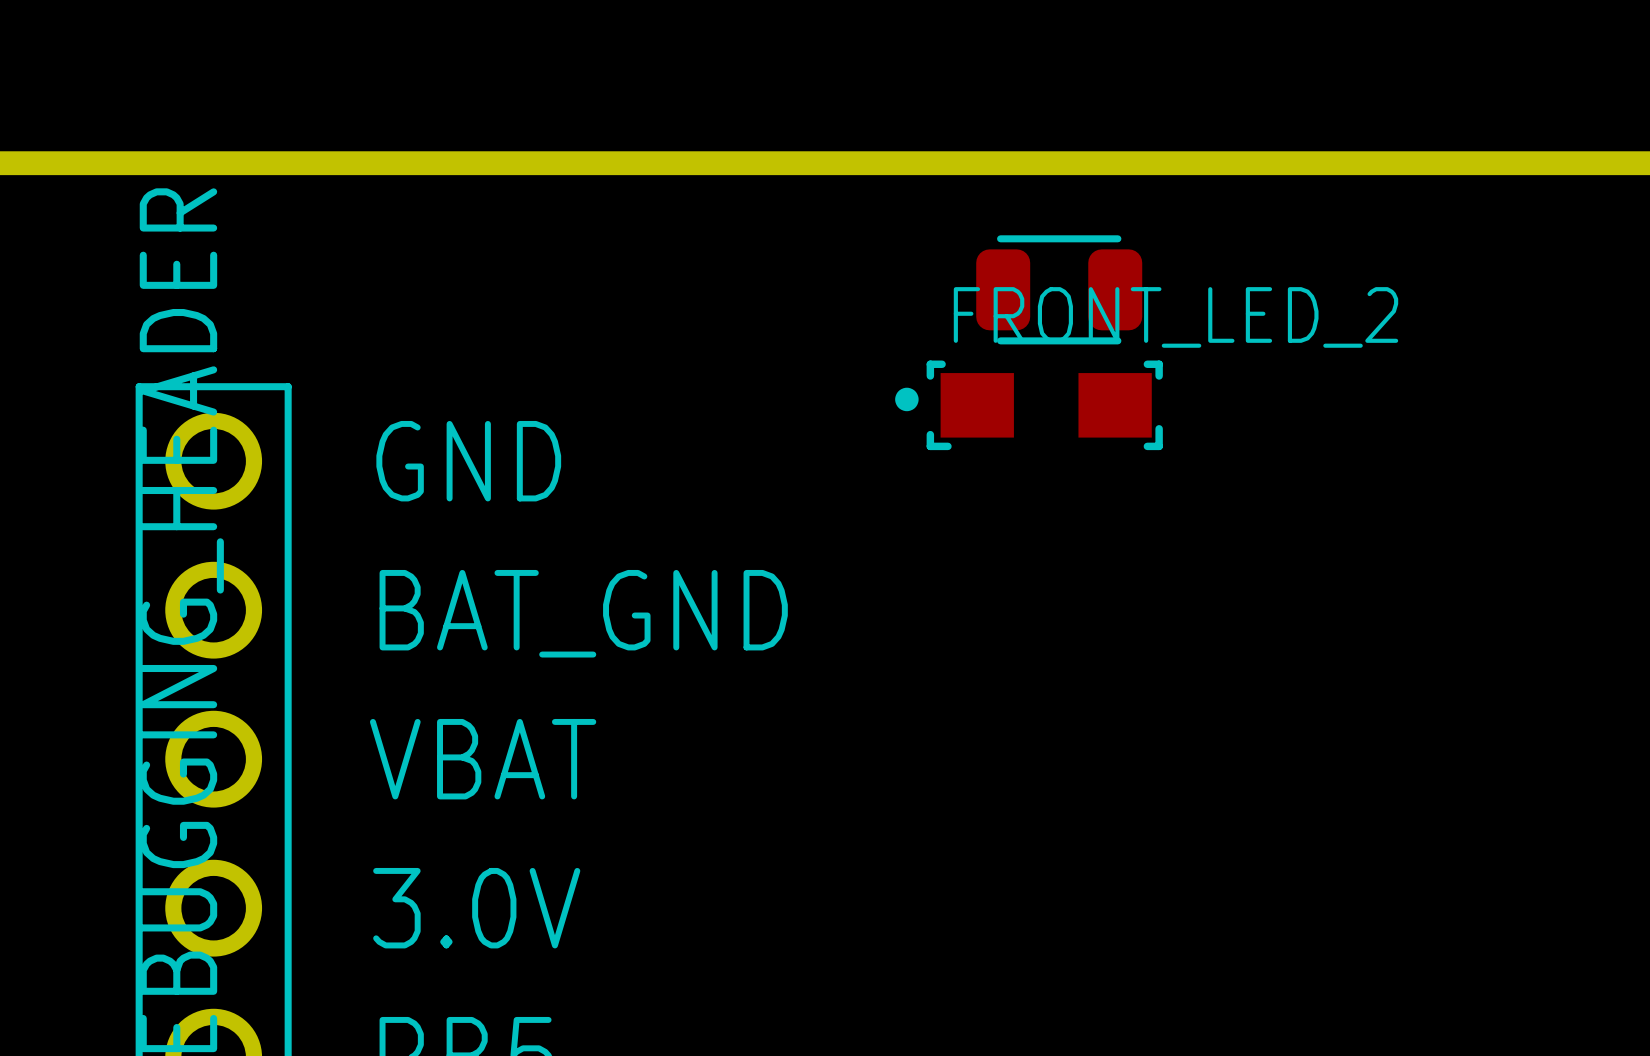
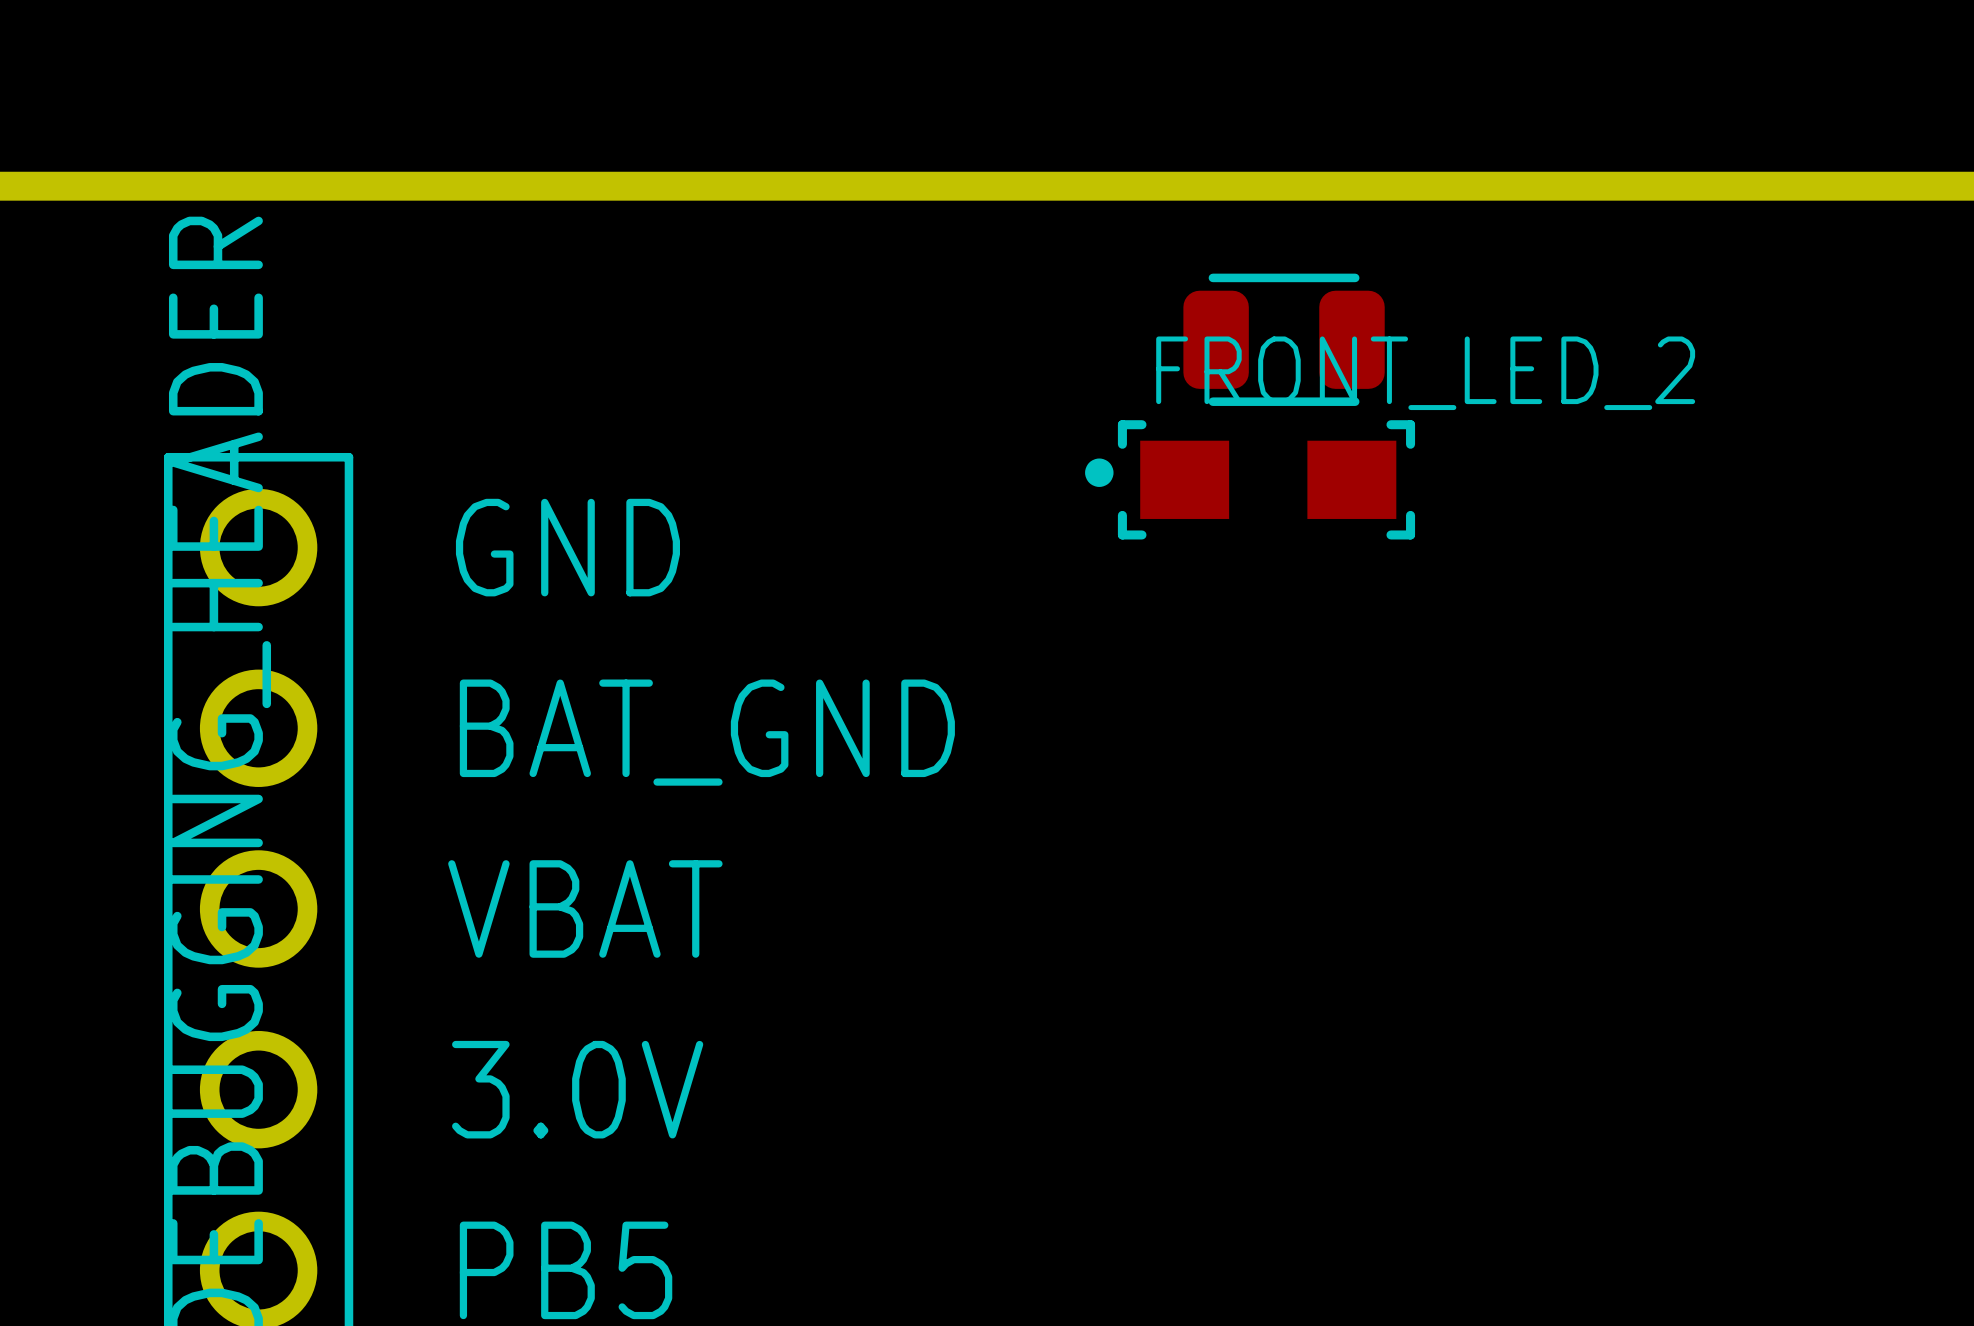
FRONT_LED_2 footprint: [895, 360, 1163, 451] -> [1085, 420, 1416, 540]

